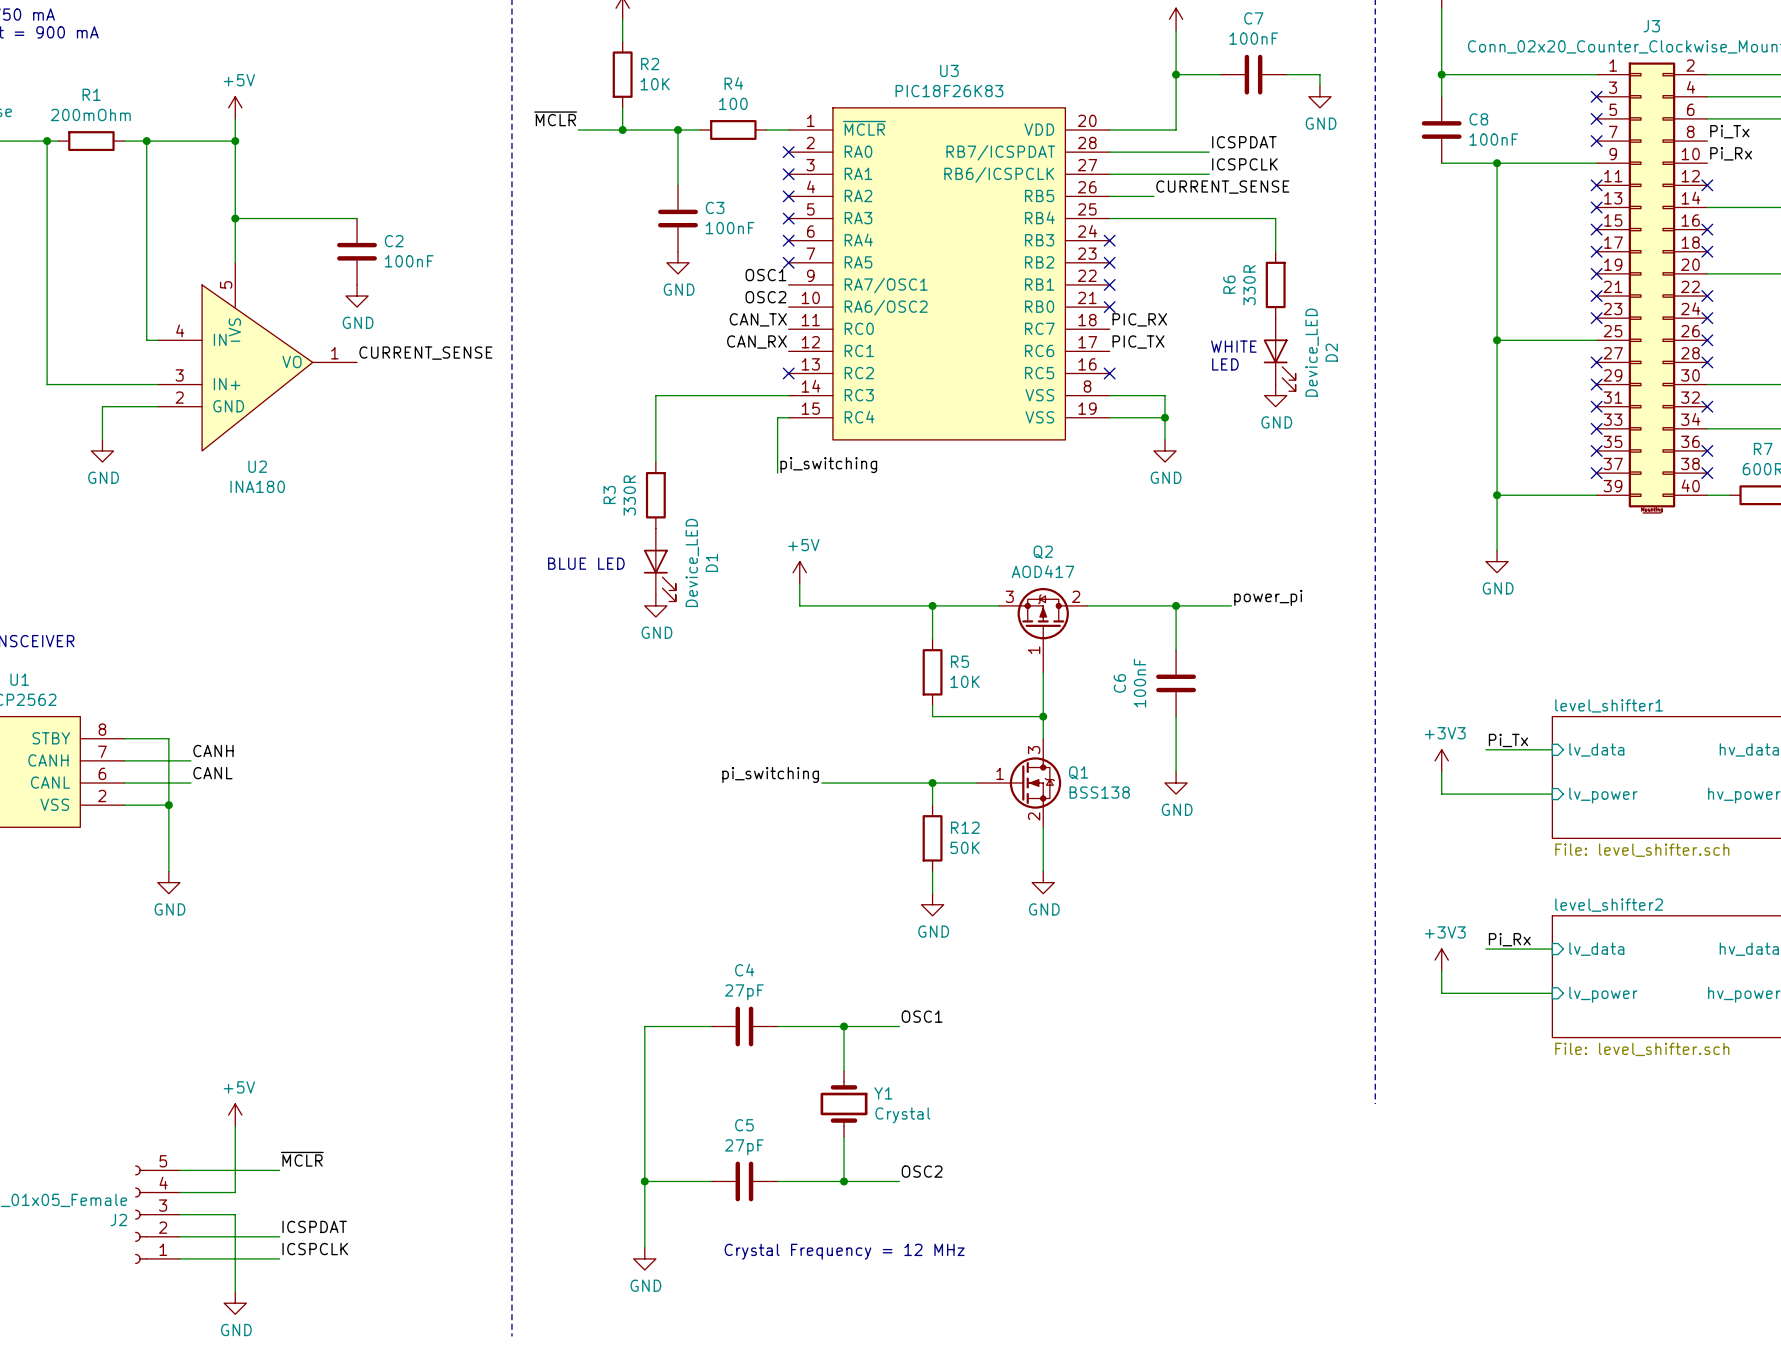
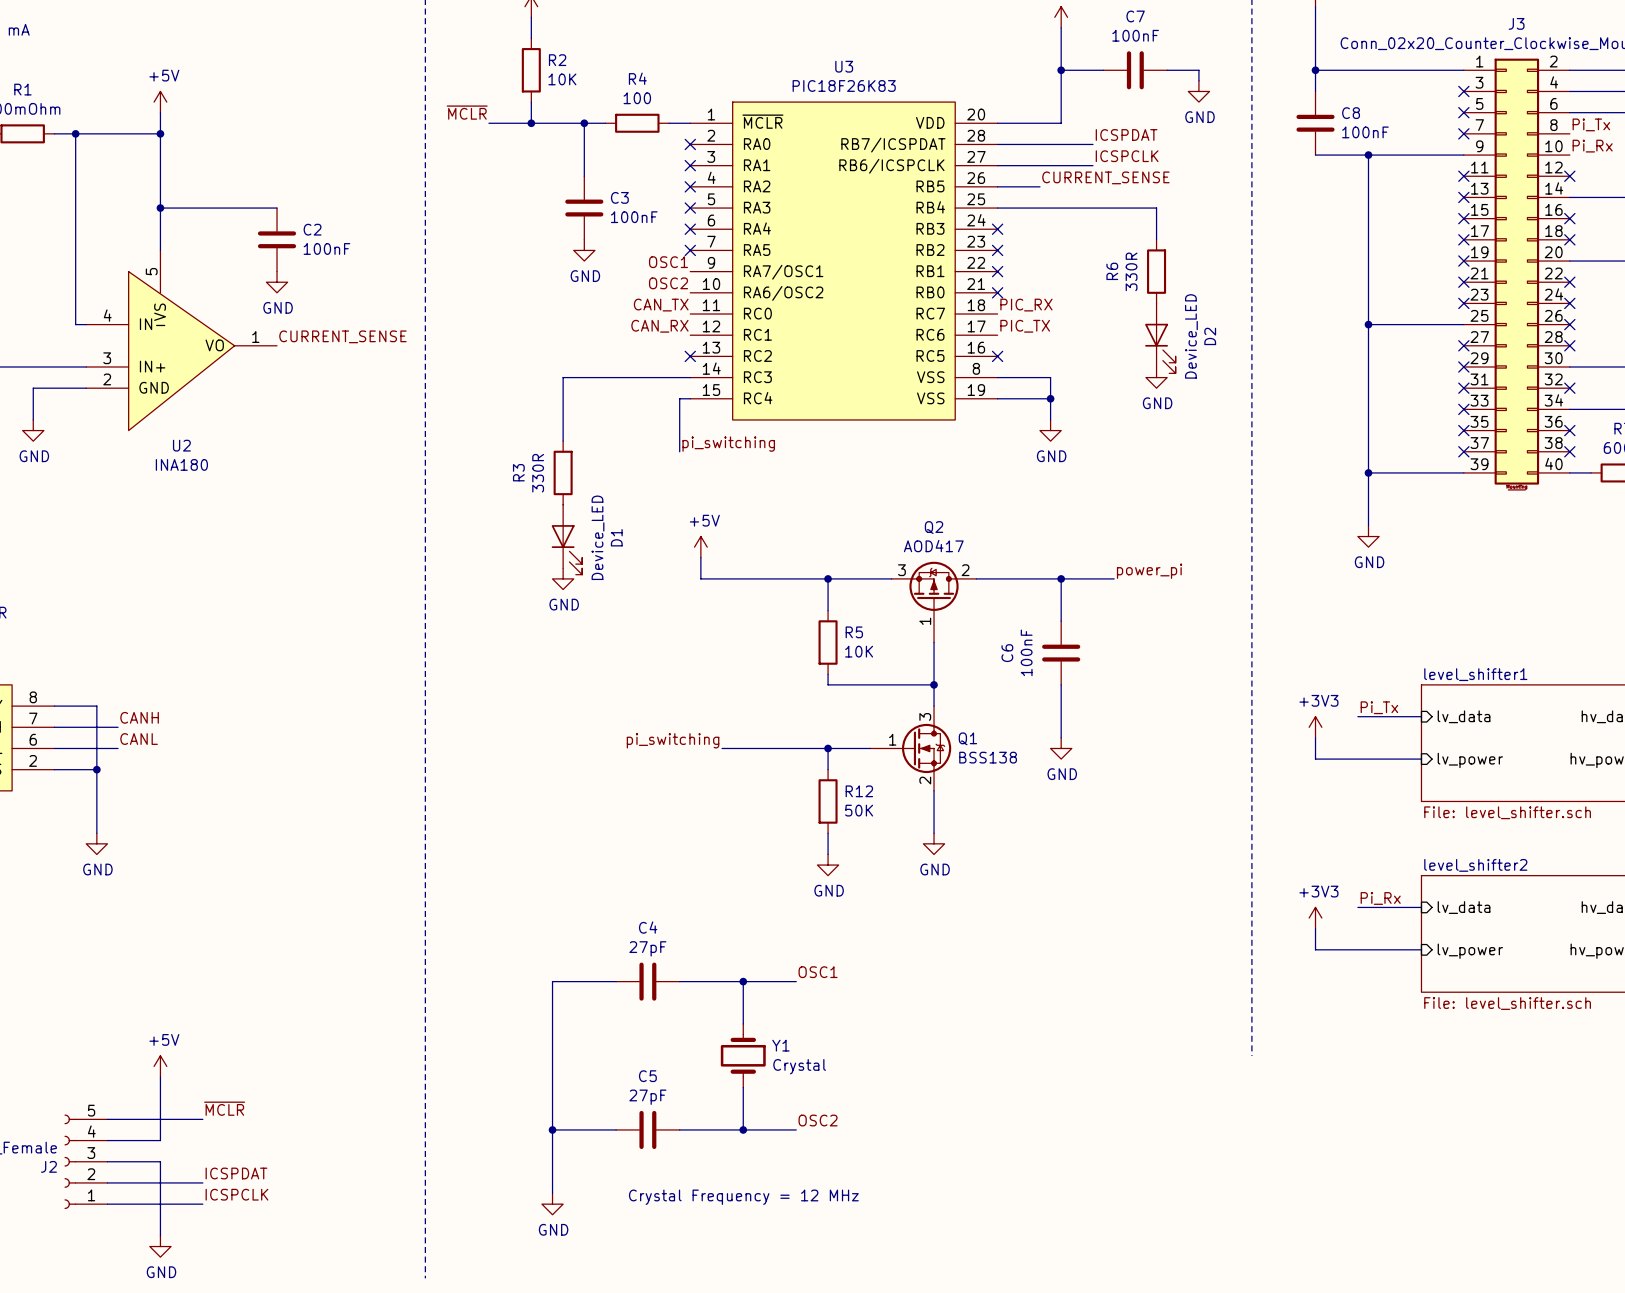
text: WHITE (1233, 346) -> none
text: LED (1225, 364) -> none
text: BLUE LED (586, 563) -> none

